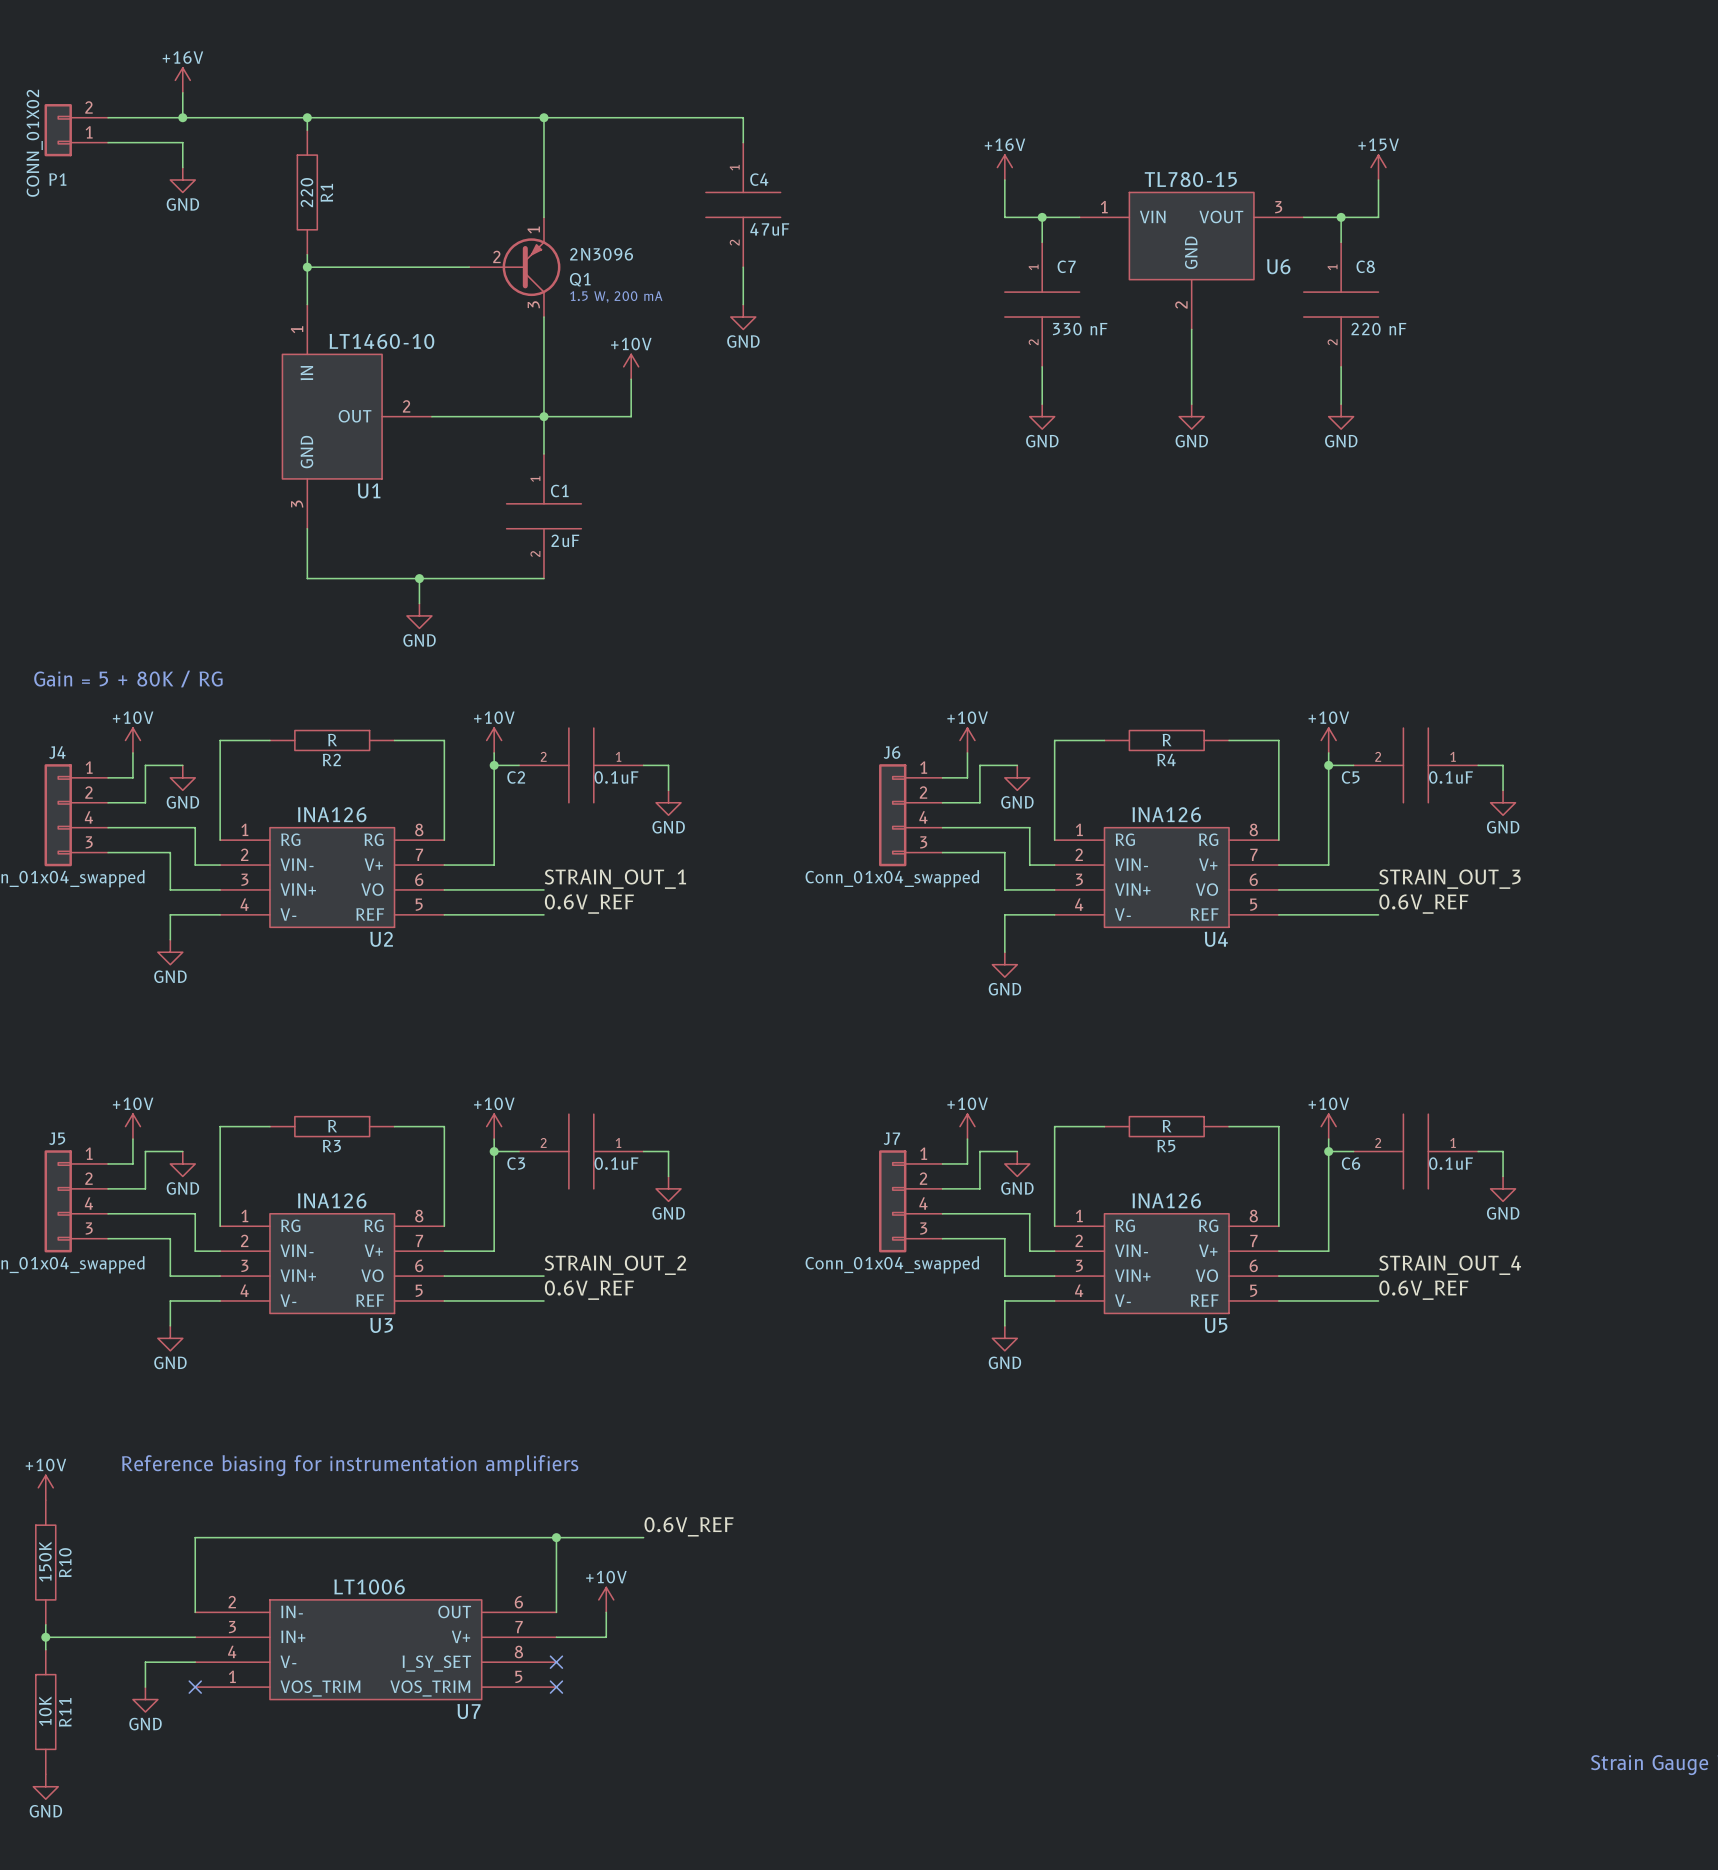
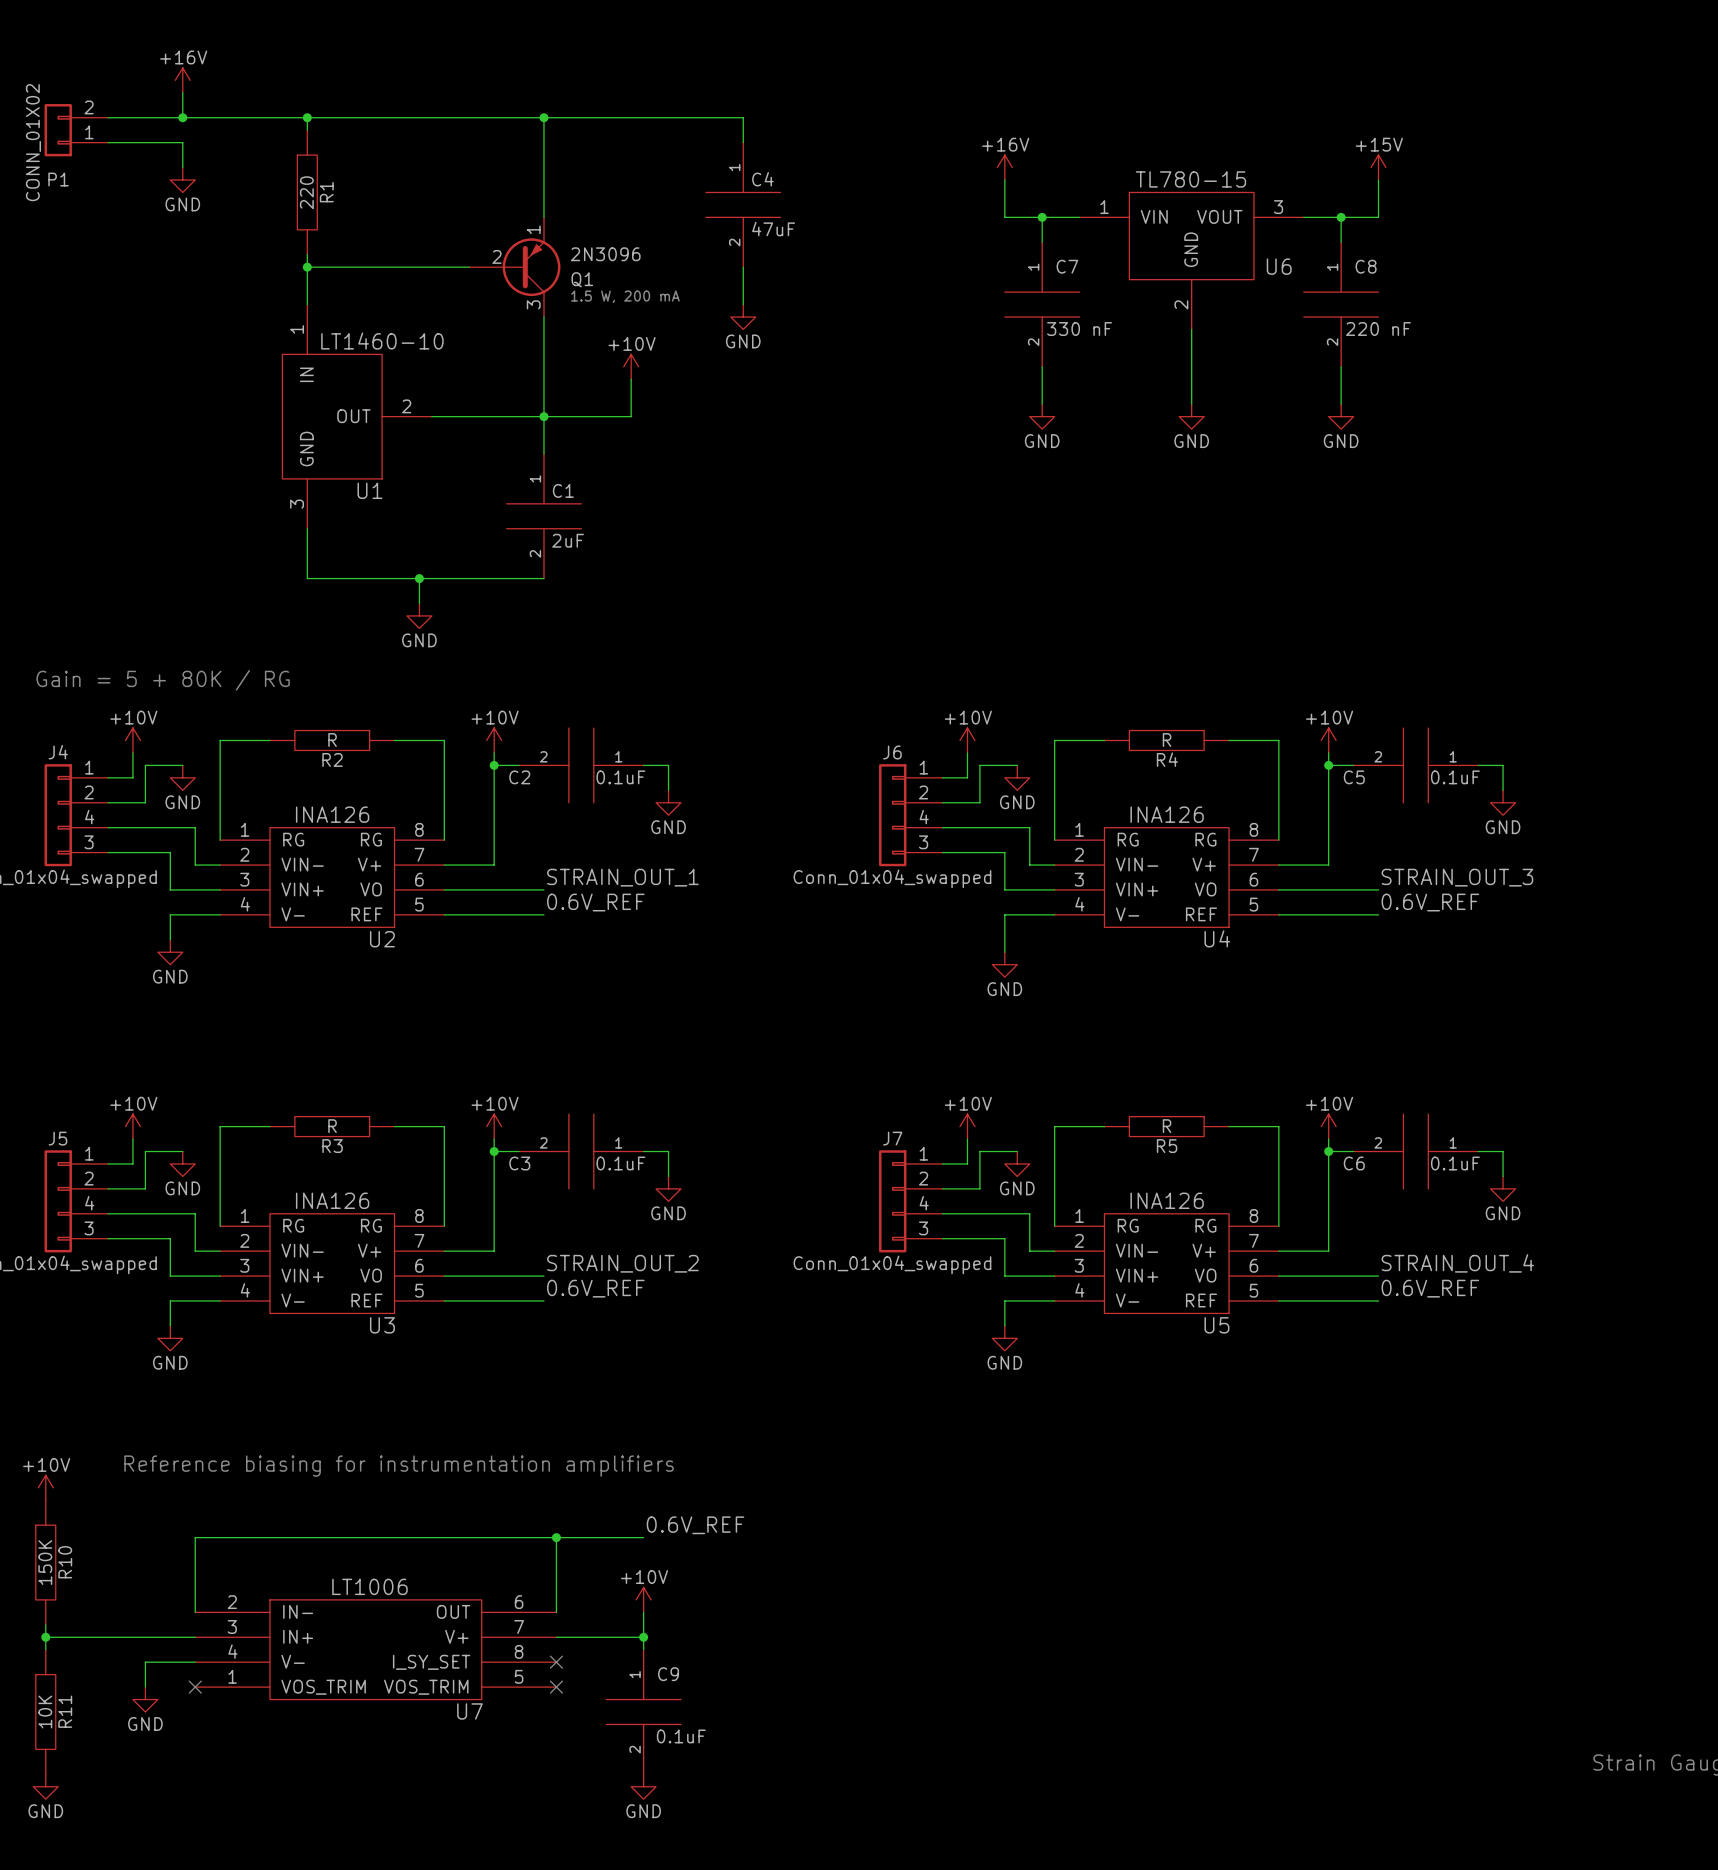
power symbol position: +10V (606, 1599) -> +10V (643, 1599)
wire: (606, 1612) (606, 1637) -> (643, 1637) (606, 1637)
wire: none -> (643, 1612) (643, 1649)
junction: none -> (643, 1637)
C9: none -> 0.1uF (643, 1712)
power symbol: none -> GND (643, 1786)

